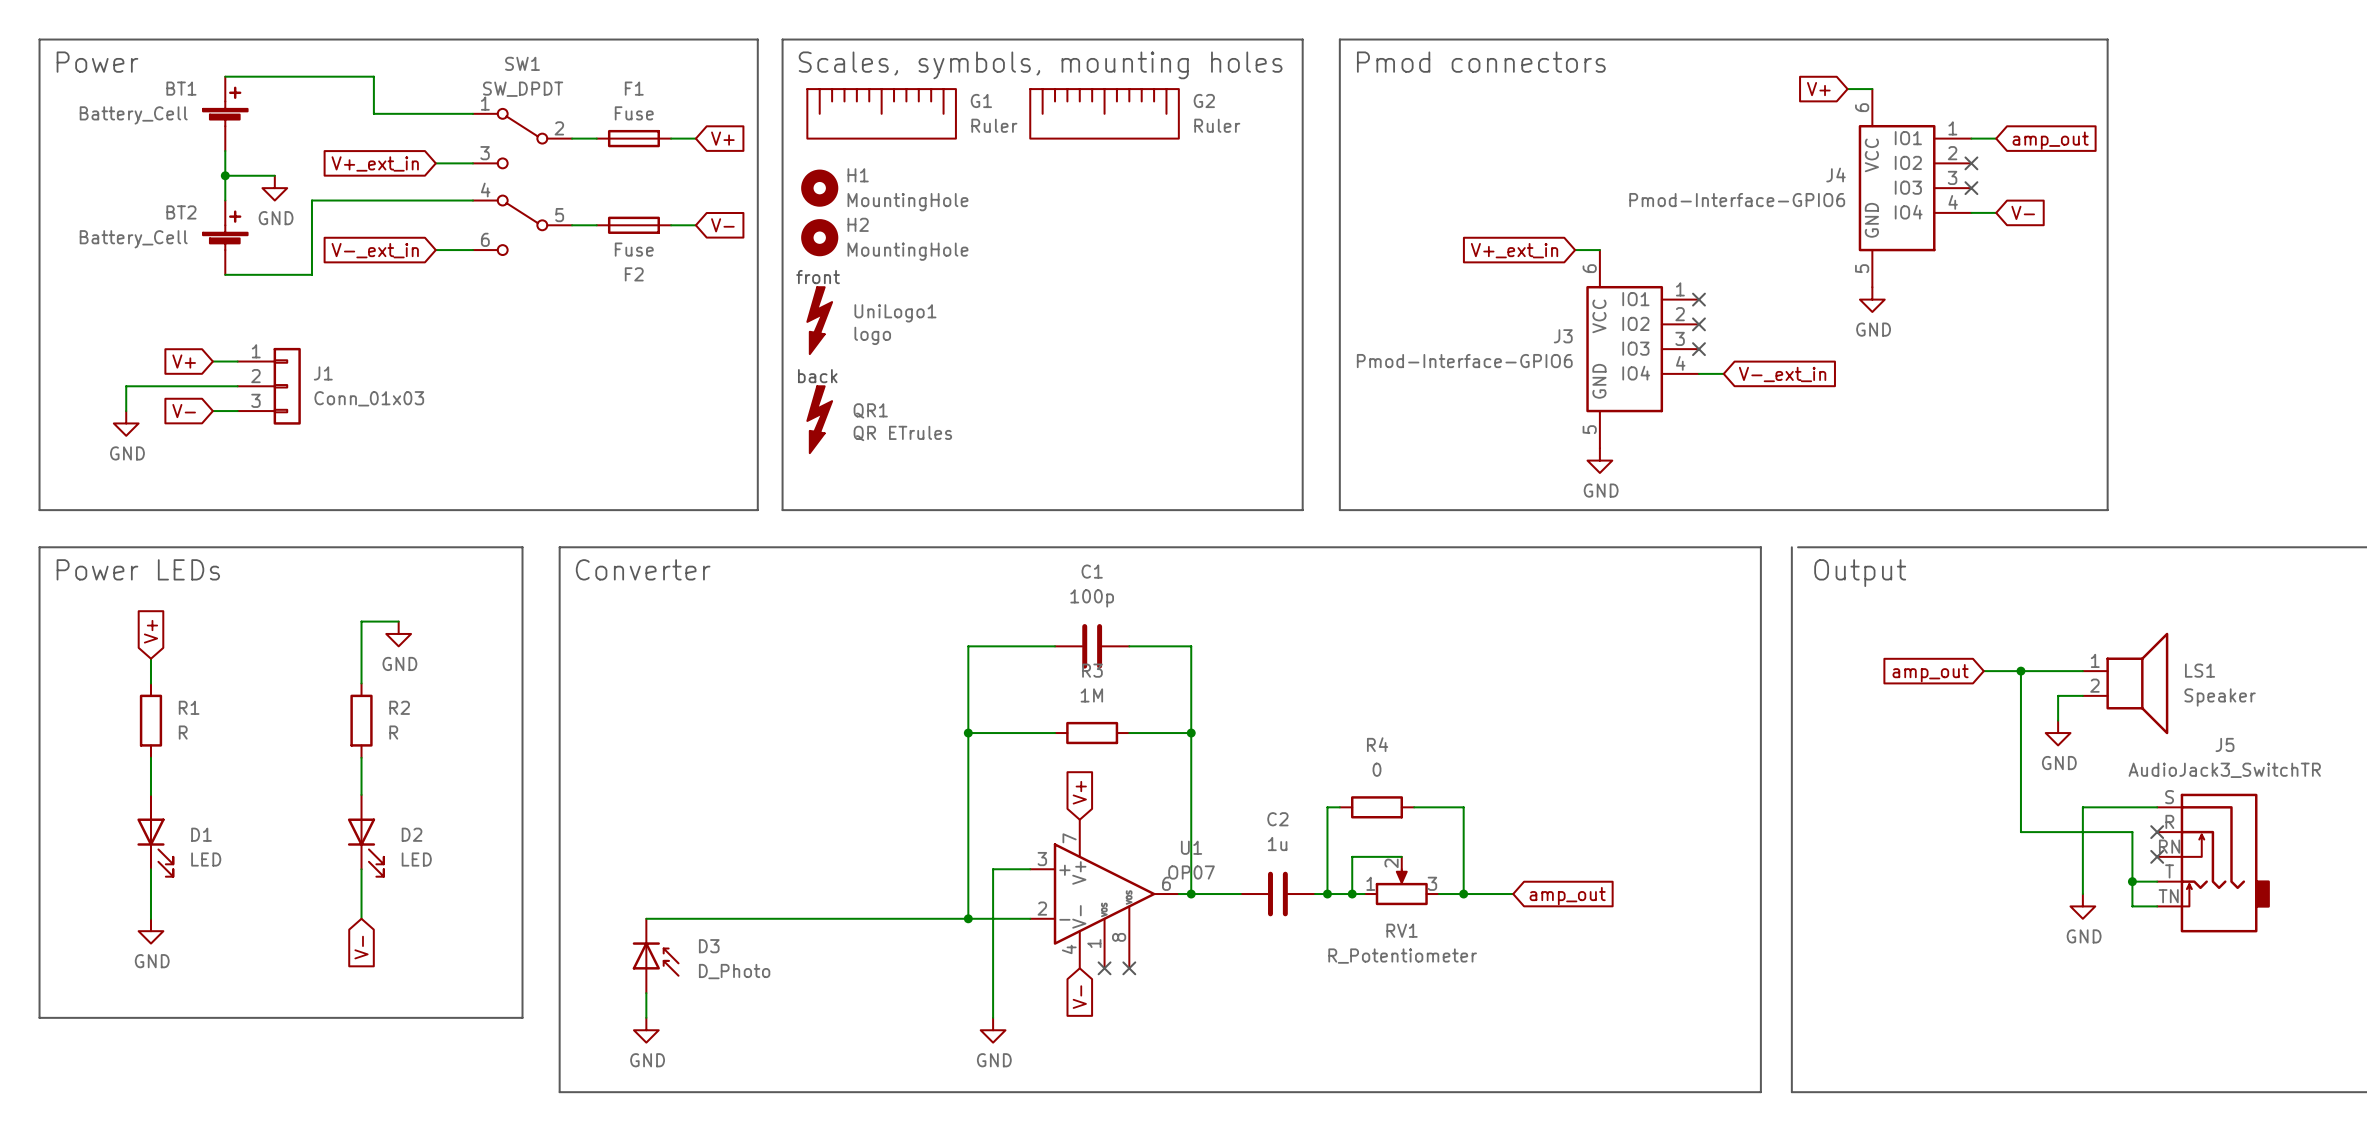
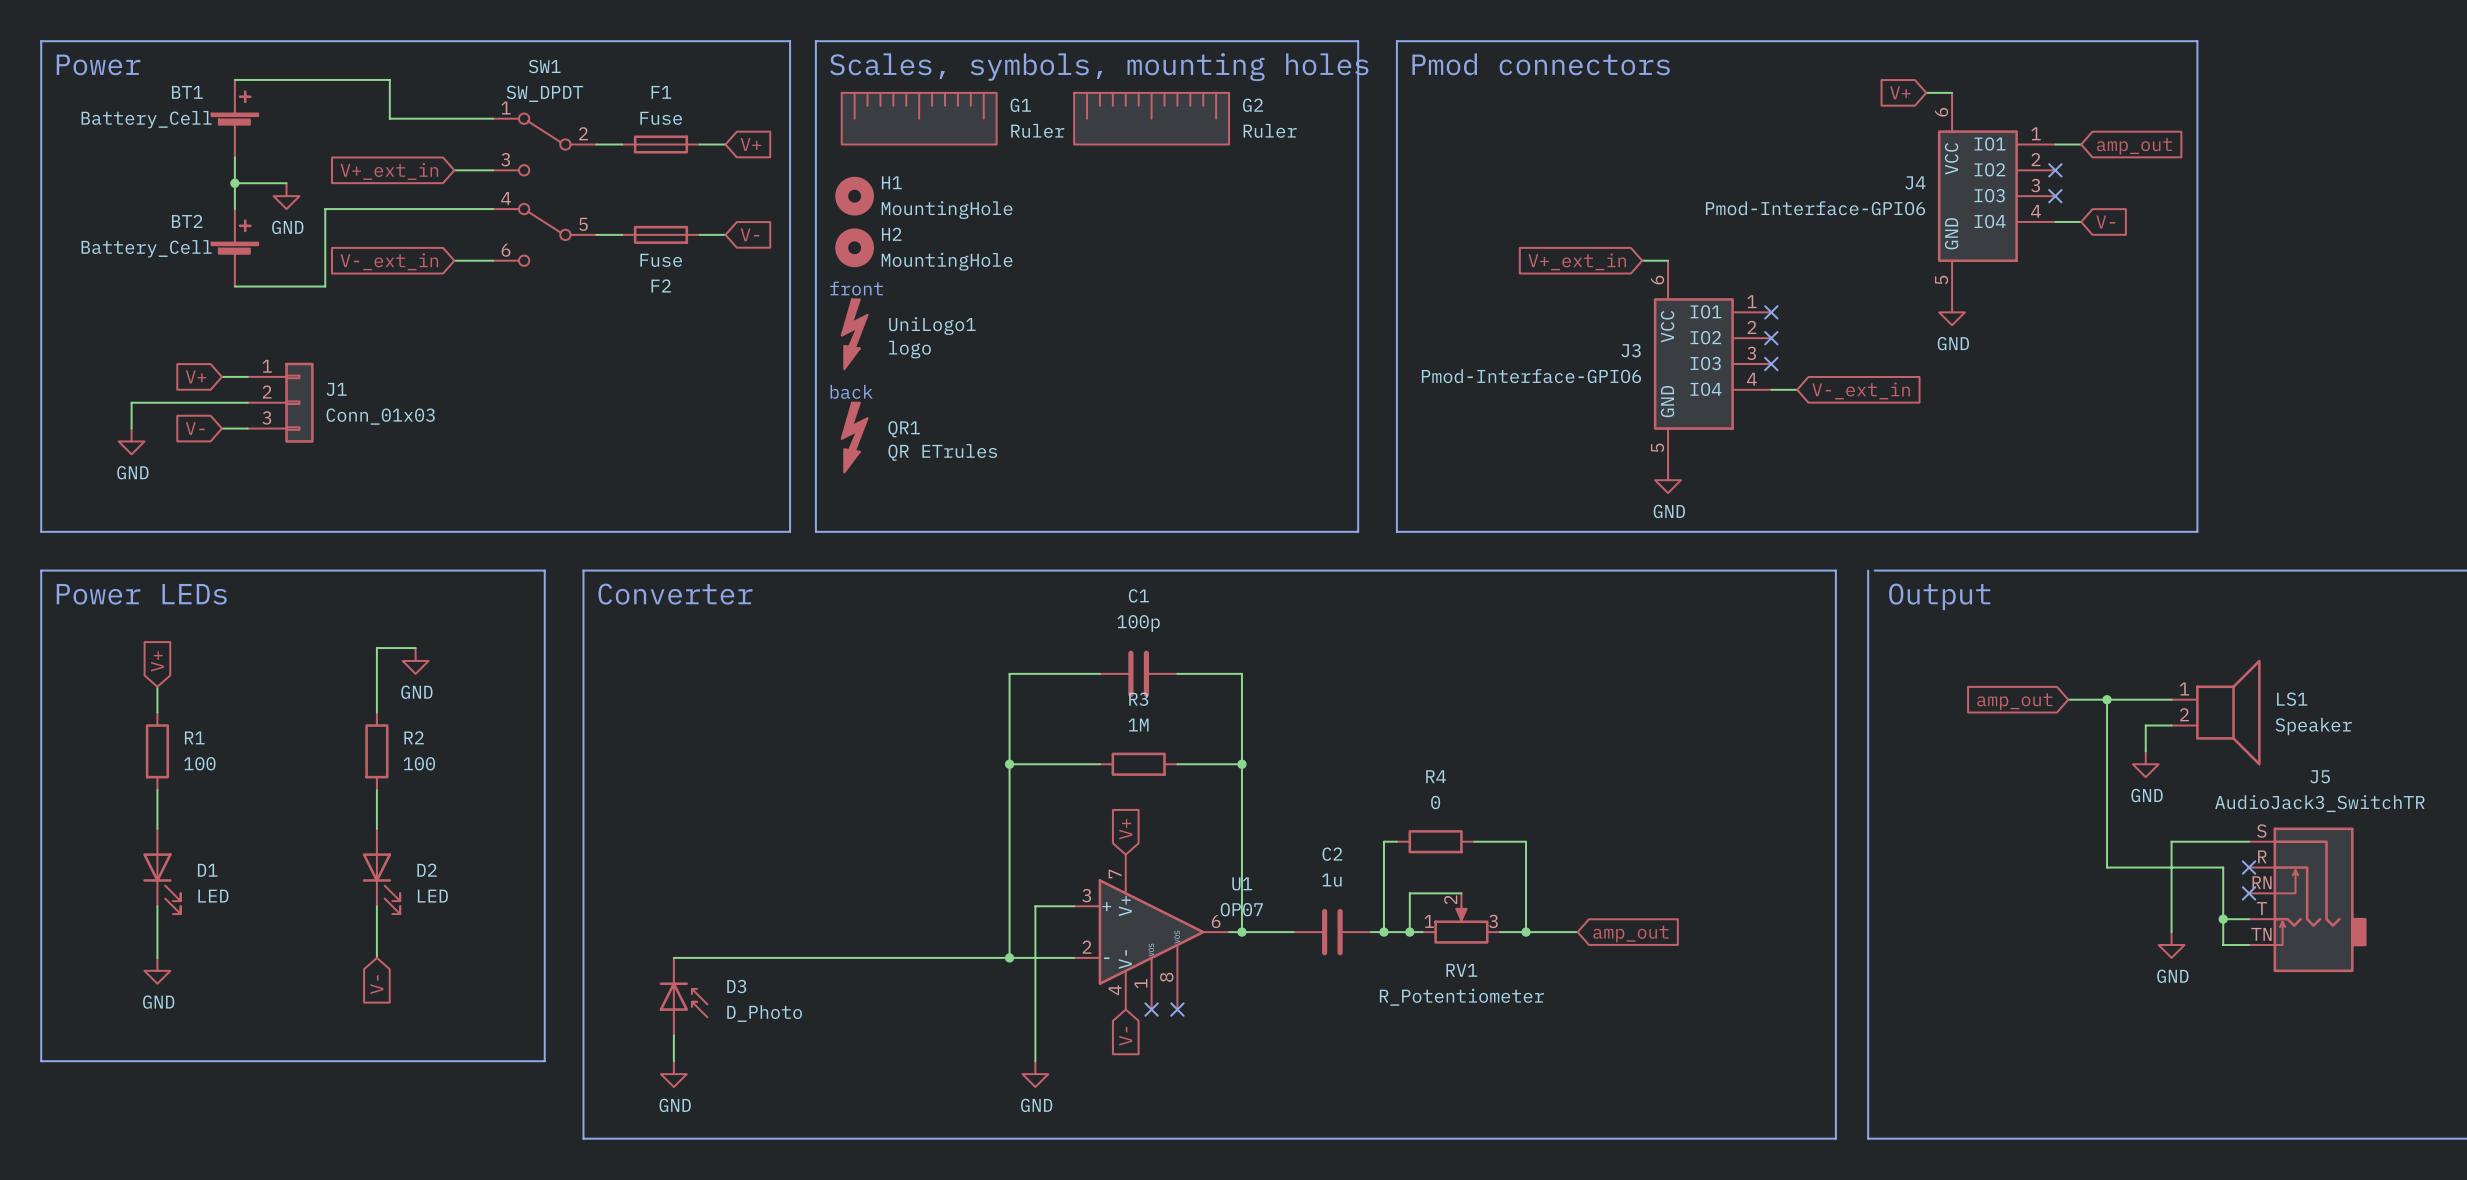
R1 value: R (183, 732) -> 100 (199, 763)
R2 value: R (393, 732) -> 100 (419, 763)

